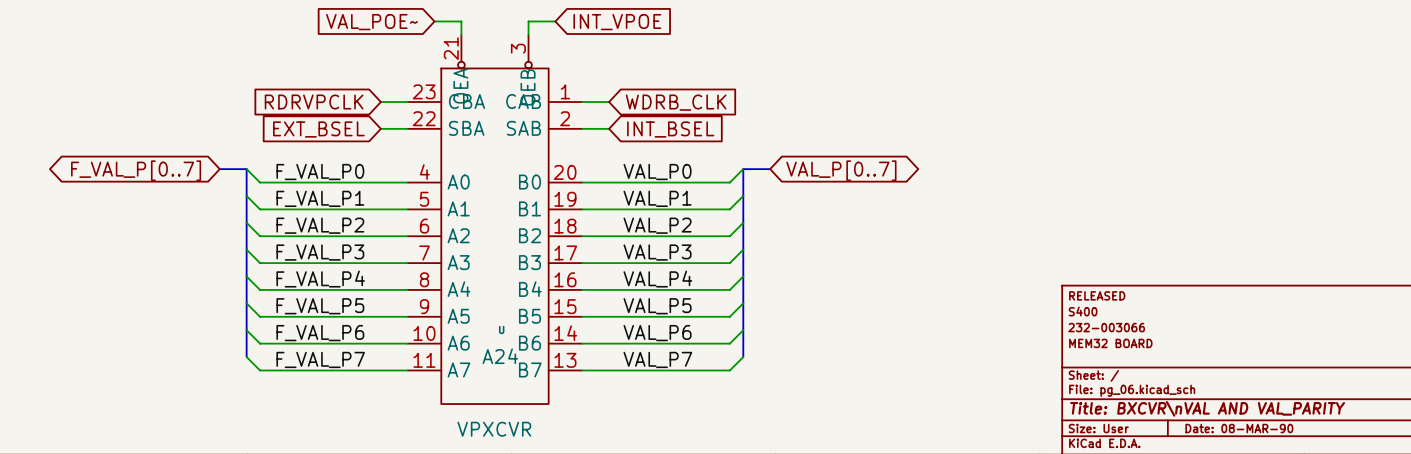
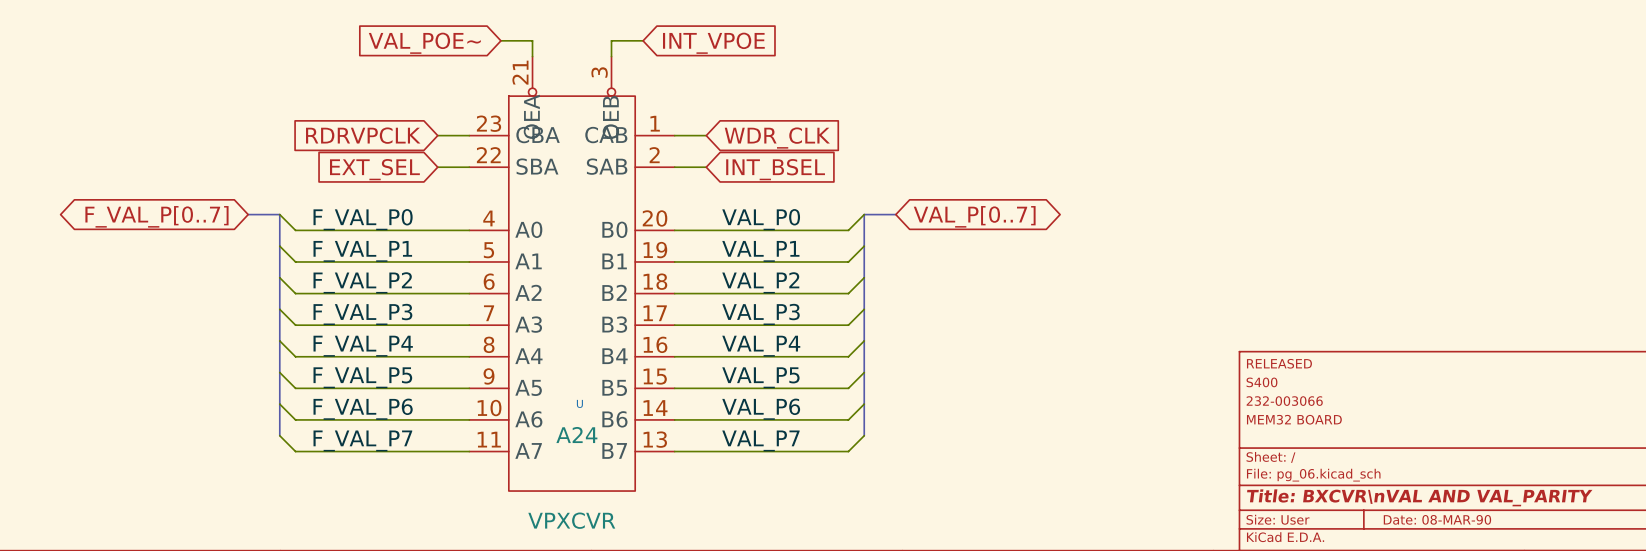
global label: WDRB_CLK (676, 102) -> WDR_CLK (777, 138)
global label: EXT_BSEL (318, 129) -> EXT_SEL (374, 169)

